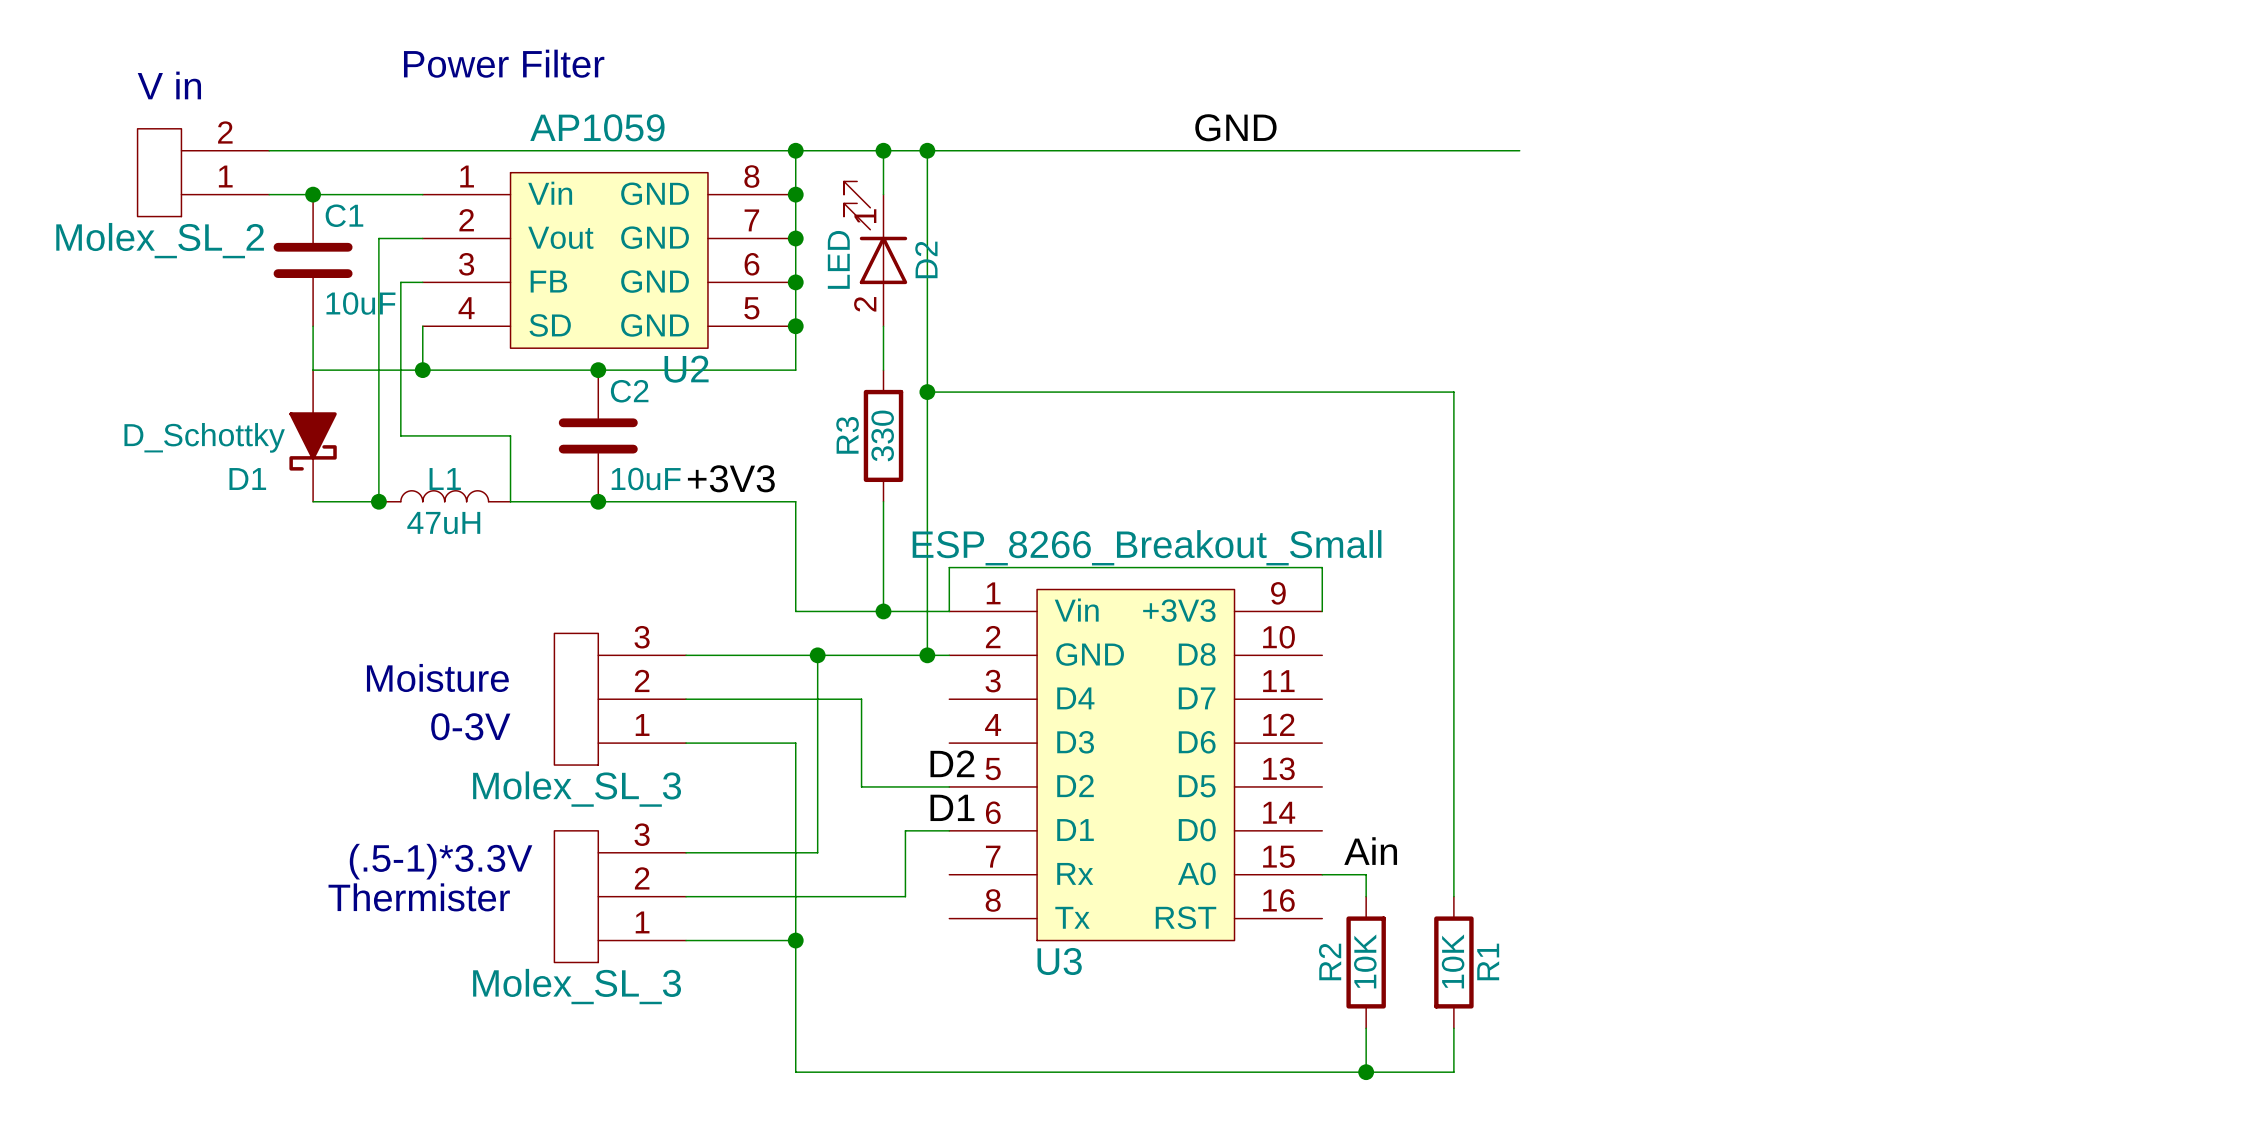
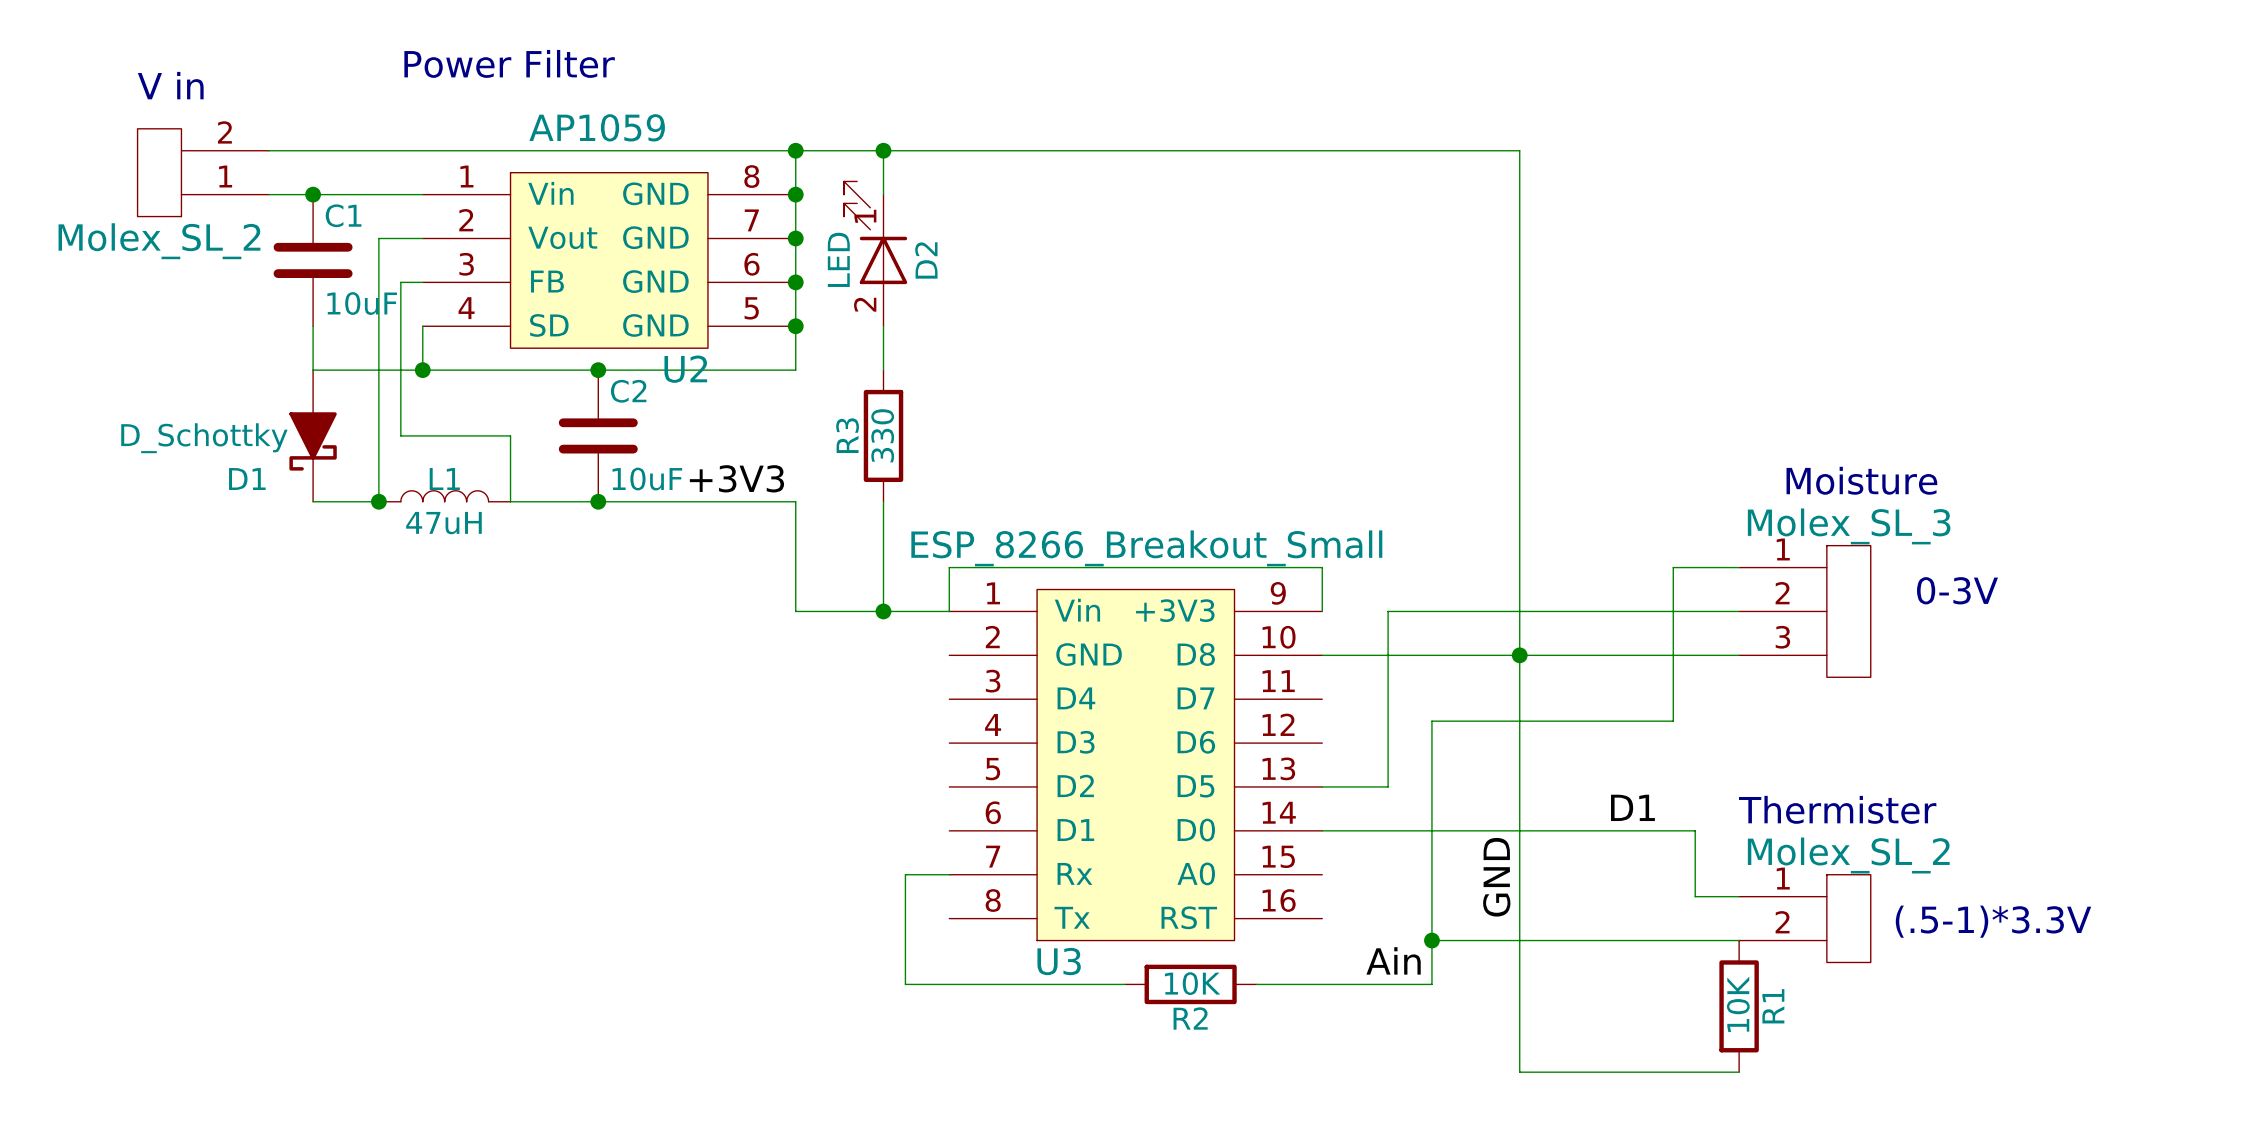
label: GND (1235, 127) -> none
wire: (927, 150) (927, 655) -> none
junction: (927, 150) -> none
wire: none -> (1519, 150) (1519, 1072) (1739, 1072)
wire: (927, 392) (1453, 392) (1453, 896) -> none
junction: (927, 392) -> none
text: none -> Moisture (1861, 480)
wire: none -> (1739, 567) (1673, 567) (1673, 721) (1431, 721) (1431, 984) (1256, 984)
text: none -> 0-3V (1957, 590)
wire: none -> (1739, 611) (1388, 611) (1388, 786) (1322, 786)
part: none -> Molex_SL_3 (1804, 611)
wire: (686, 655) (949, 655) -> none
wire: (817, 655) (817, 852) (686, 852) -> none
junction: (817, 655) -> none
junction: (927, 655) -> none
wire: none -> (1322, 655) (1739, 655)
junction: none -> (1519, 655)
text: Moisture (437, 678) -> none
part: Molex_SL_3 (620, 699) -> none
wire: (686, 699) (861, 699) (861, 786) (949, 786) -> none
text: 0-3V (470, 726) -> none
wire: (686, 743) (795, 743) (795, 1072) (1453, 1072) (1453, 1028) -> none
label: D2 (952, 763) -> none
label: D1 (952, 807) -> none
label: none -> D1 (1632, 807)
text: none -> Thermister (1837, 809)
wire: (949, 830) (905, 830) (905, 874) -> (949, 874) (905, 874)
wire: none -> (1322, 830) (1695, 830) (1695, 896) (1739, 896)
label position: Ain (1370, 851) -> Ain (1393, 960)
text: (.5-1)*3.3V (441, 861) -> none
wire: (1322, 874) (1366, 874) (1366, 896) -> none
label: none -> GND (1496, 877)
part: Molex_SL_3 (620, 896) -> none
wire: (686, 896) (905, 896) -> (1124, 984) (905, 984) (905, 896)
text: Thermister (419, 897) -> none
part: none -> Molex_SL_2 (1804, 918)
text: none -> (.5-1)*3.3V (1993, 921)
wire: (686, 940) (795, 940) -> none
junction: (795, 940) -> none
wire: none -> (1431, 940) (1739, 940)
junction: none -> (1431, 940)
R2 name position: R2 (1330, 961) -> R2 (1190, 1018)
R2 rotation: 0° (1366, 962) -> 90° clockwise (1190, 984)
R2 position: (1366, 962) -> (1190, 984)
R1 position: (1453, 962) -> (1739, 1006)
wire: (1366, 1028) (1366, 1072) -> none
junction: (1366, 1072) -> none

